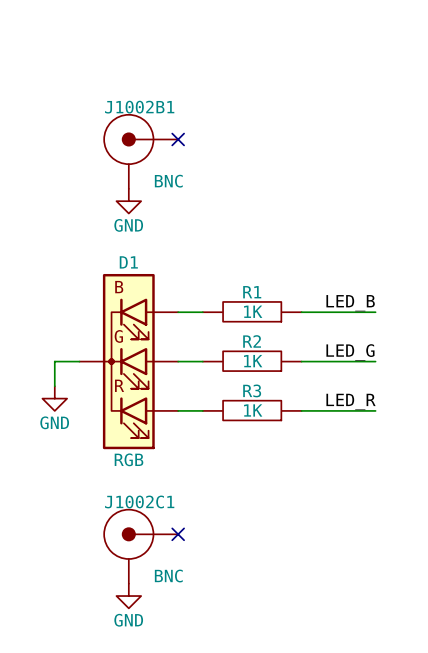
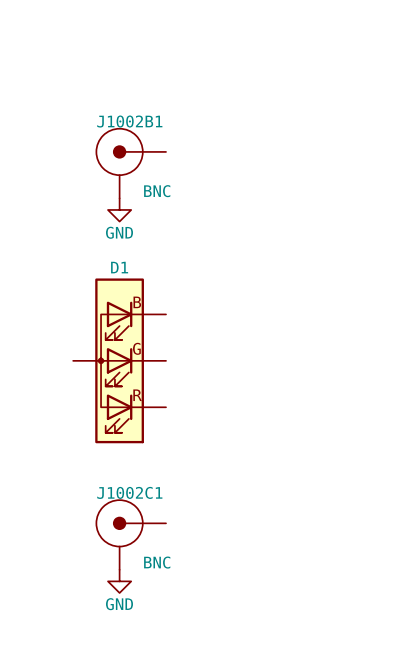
no-connect mark: (178, 139) -> none
D1 symbol: [79, 273, 179, 450] -> [73, 278, 167, 444]
label: LED_B (350, 303) -> none
R1: 1K (252, 311) -> none
wire: (178, 312) (202, 312) -> none
wire: (301, 312) (375, 312) -> none
label: LED_G (350, 352) -> none
wire: (79, 361) (54, 361) (54, 386) -> none
wire: (178, 361) (202, 361) -> none
R2: 1K (252, 361) -> none
wire: (301, 361) (375, 361) -> none
power symbol: GND (54, 398) -> none
label: LED_R (351, 401) -> none
wire: (178, 410) (202, 410) -> none
R3: 1K (252, 410) -> none
wire: (301, 410) (375, 410) -> none
D1 value: RGB (129, 459) -> none
no-connect mark: (178, 534) -> none

